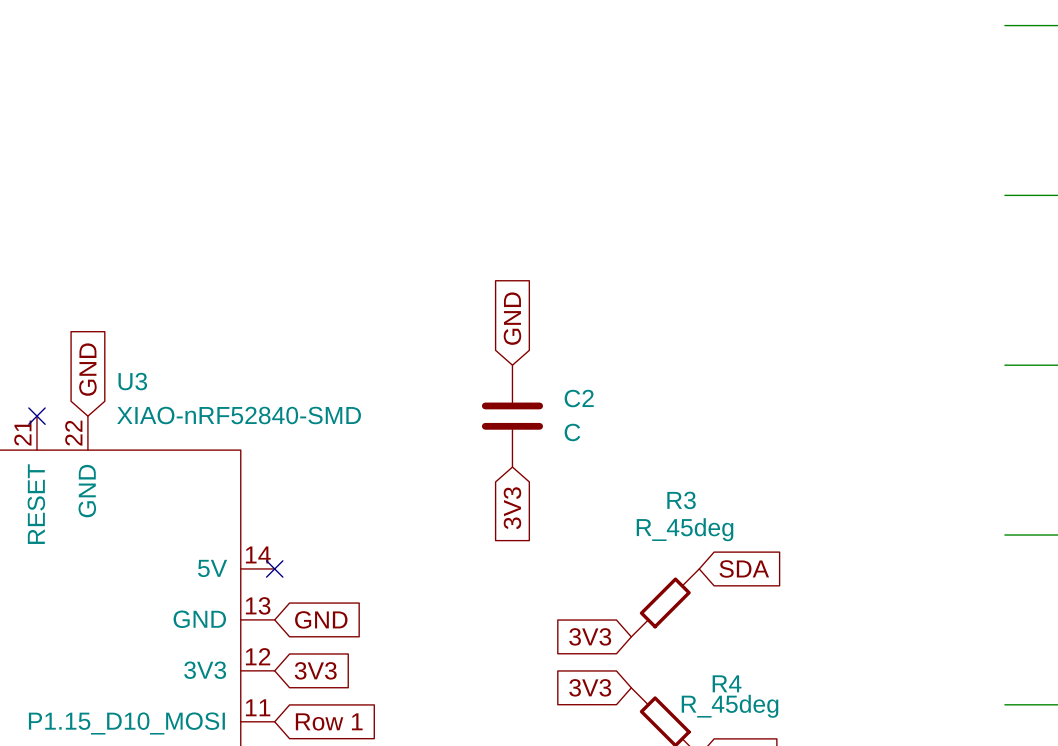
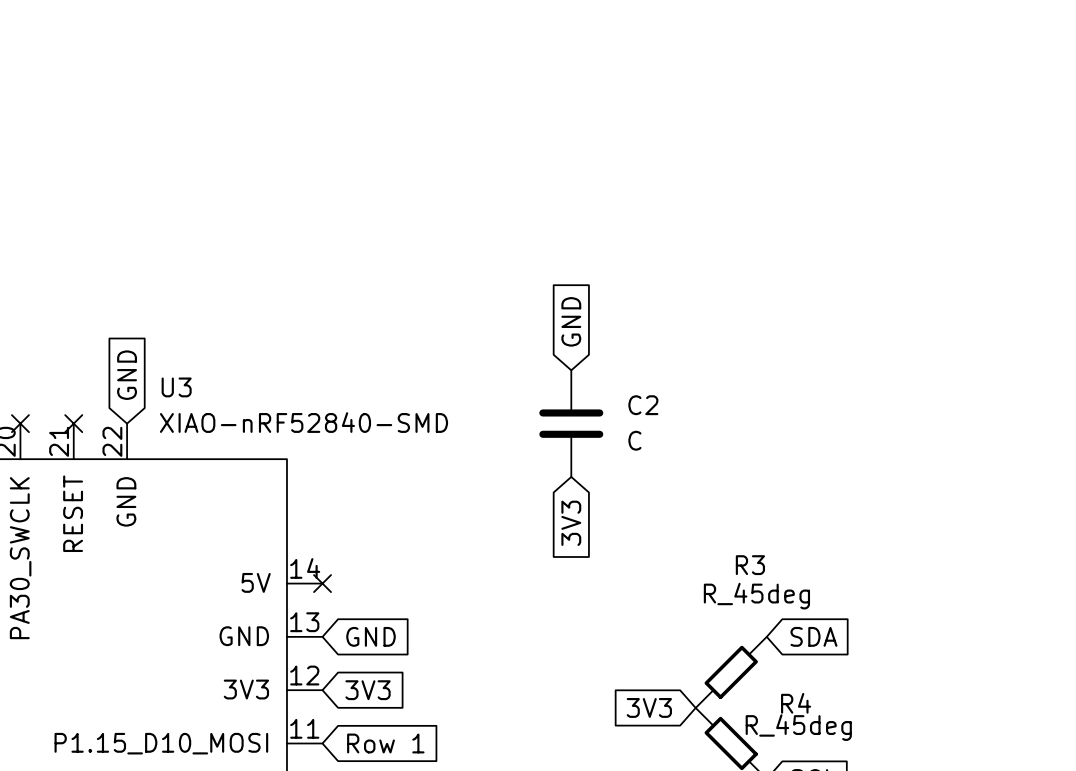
global label position: SDA (744, 568) -> SDA (813, 636)
R3 position: (665, 602) -> (731, 672)
global label: 3V3 (590, 636) -> none

